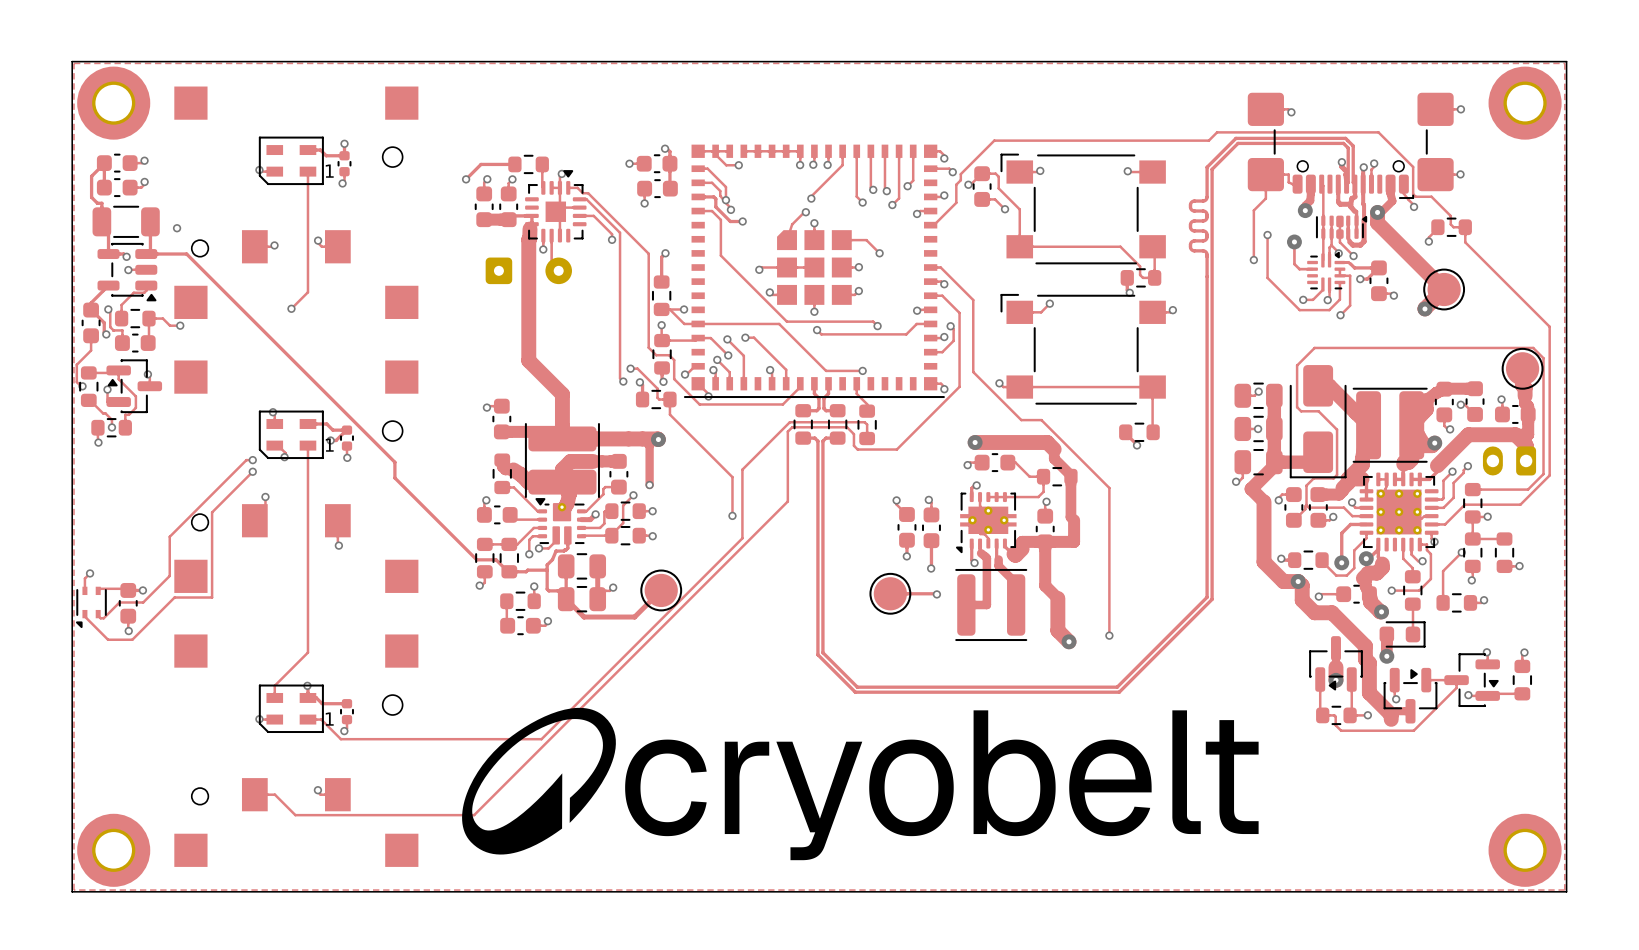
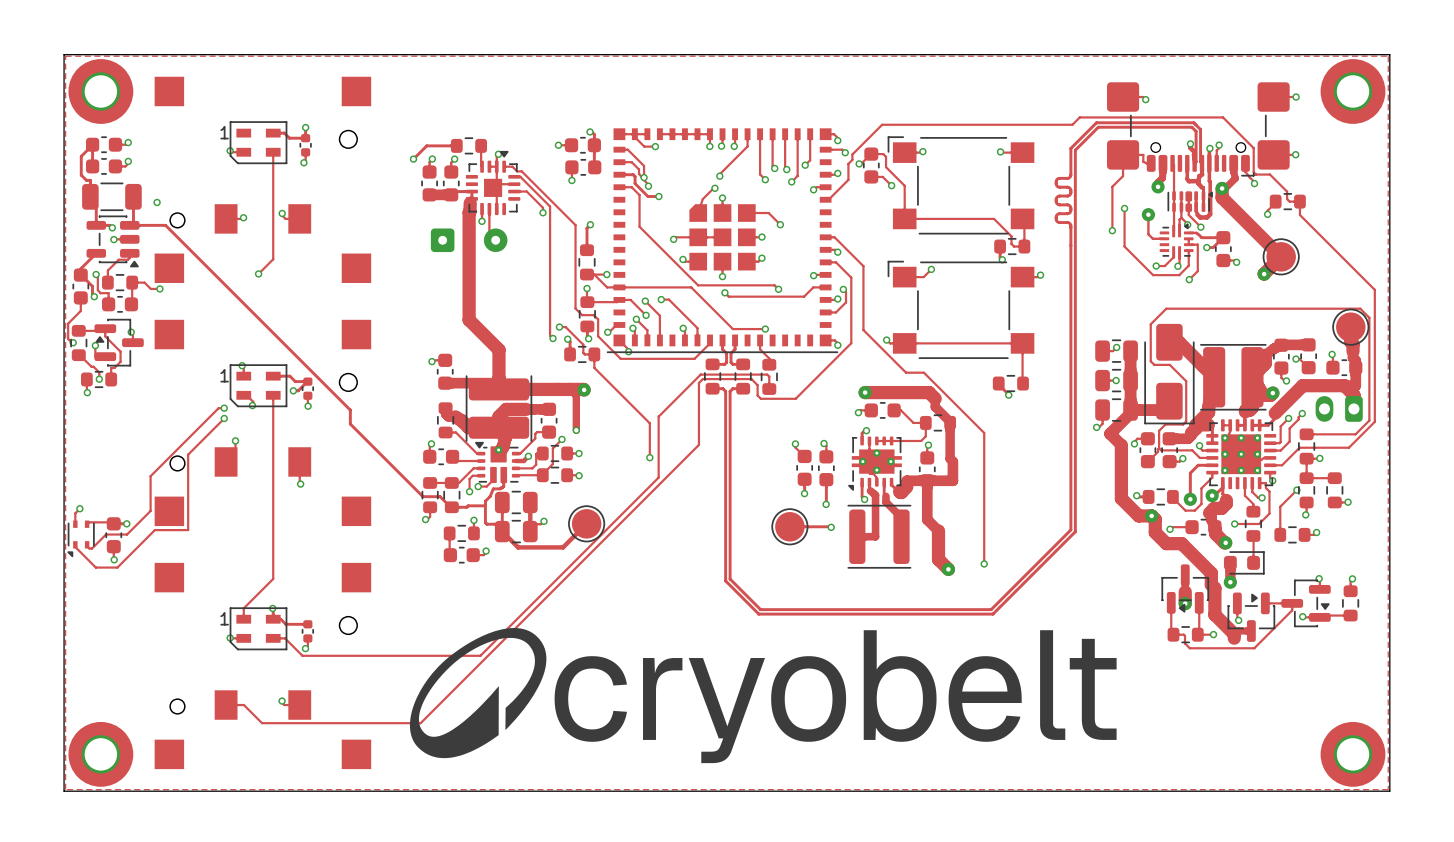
part text position: 1 (329, 171) -> 1 (224, 132)
part text position: 1 (329, 445) -> 1 (224, 375)
part text position: 1 (329, 719) -> 1 (224, 618)

